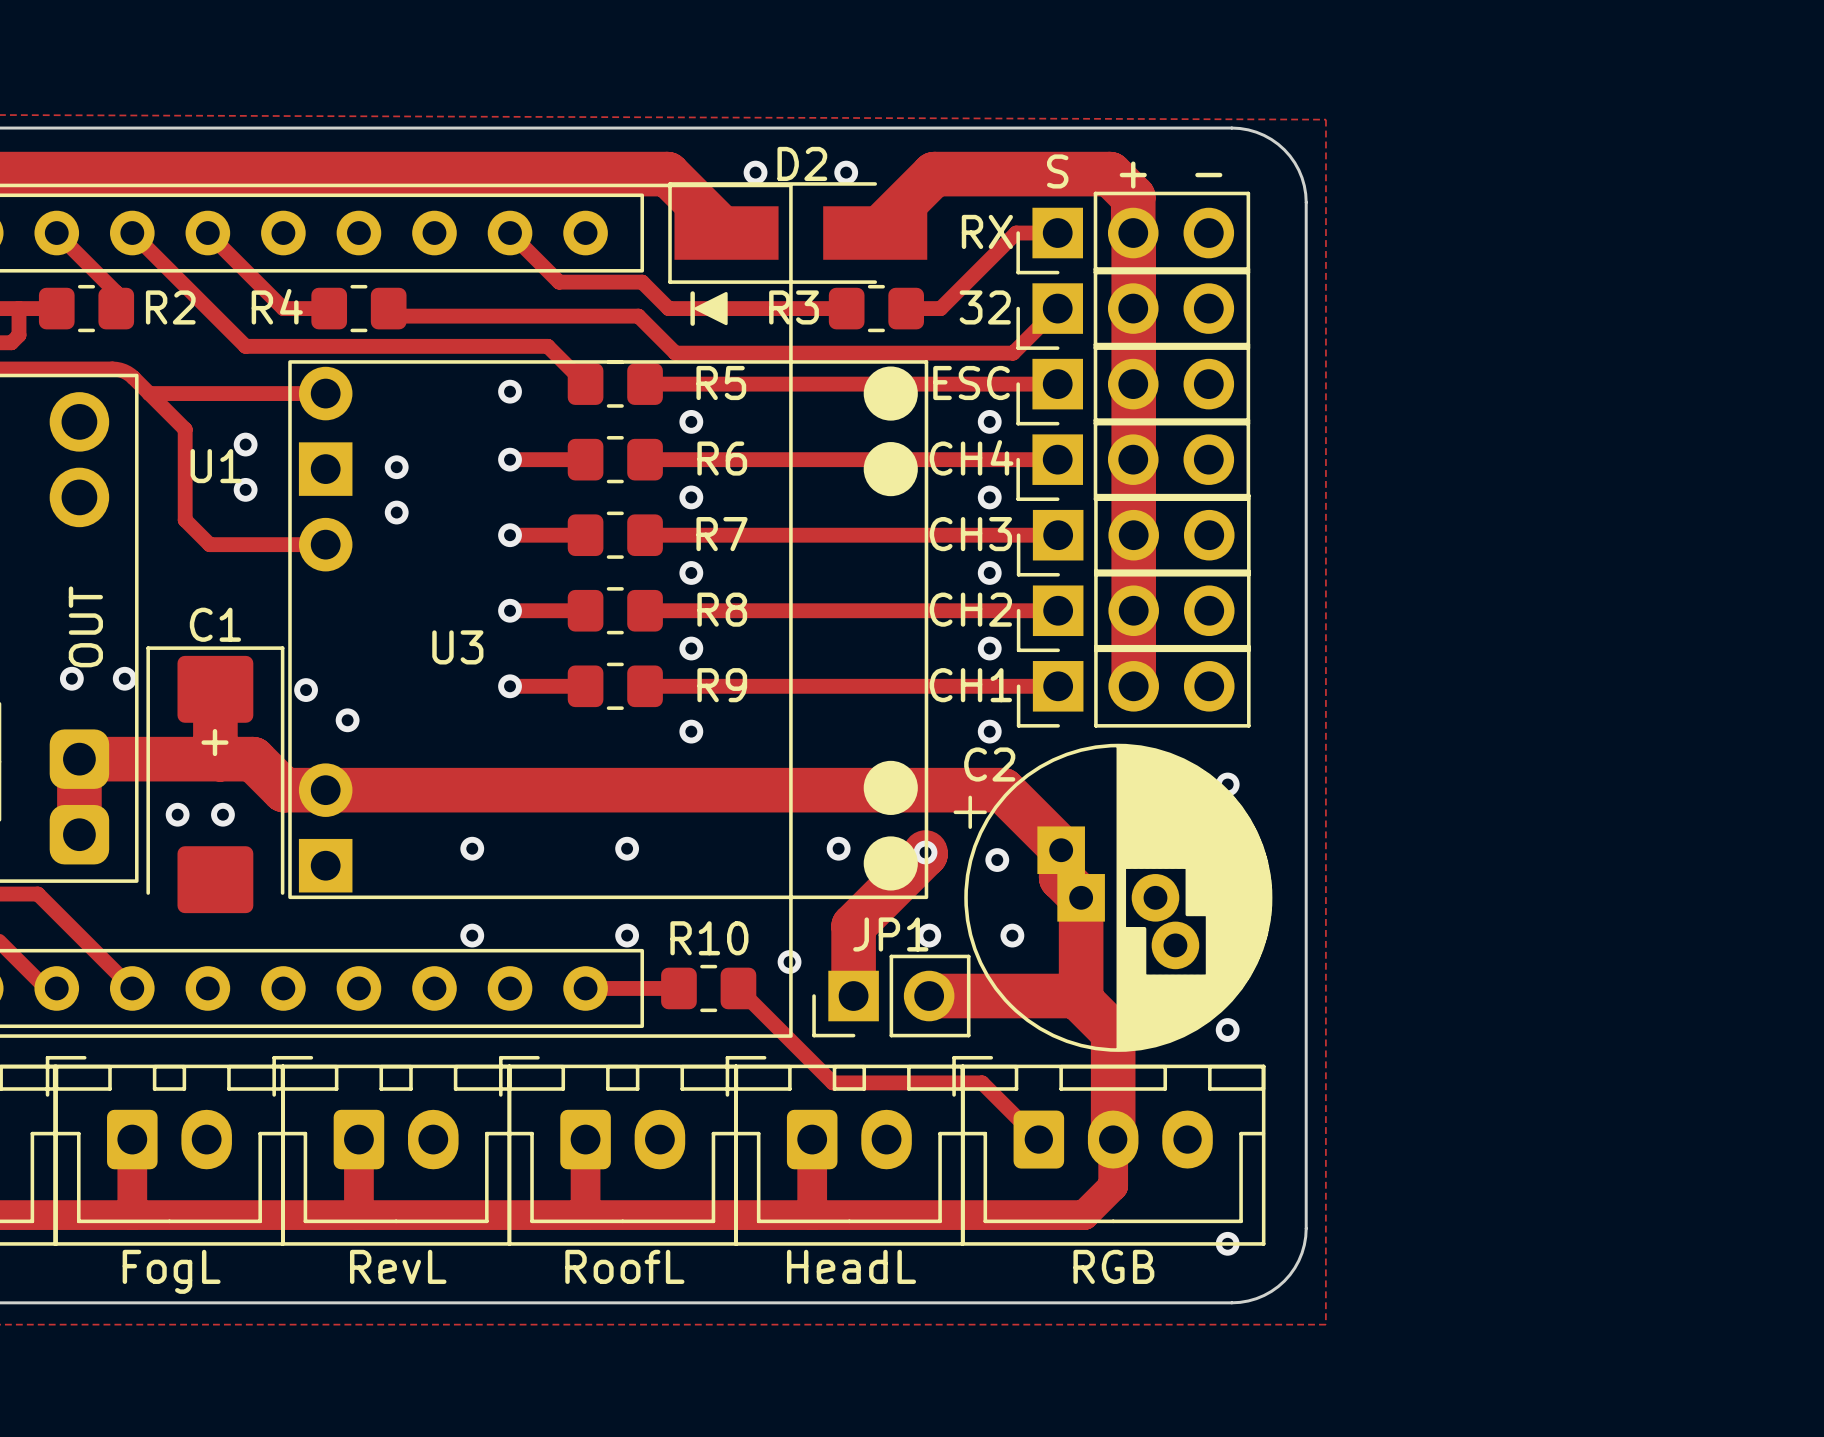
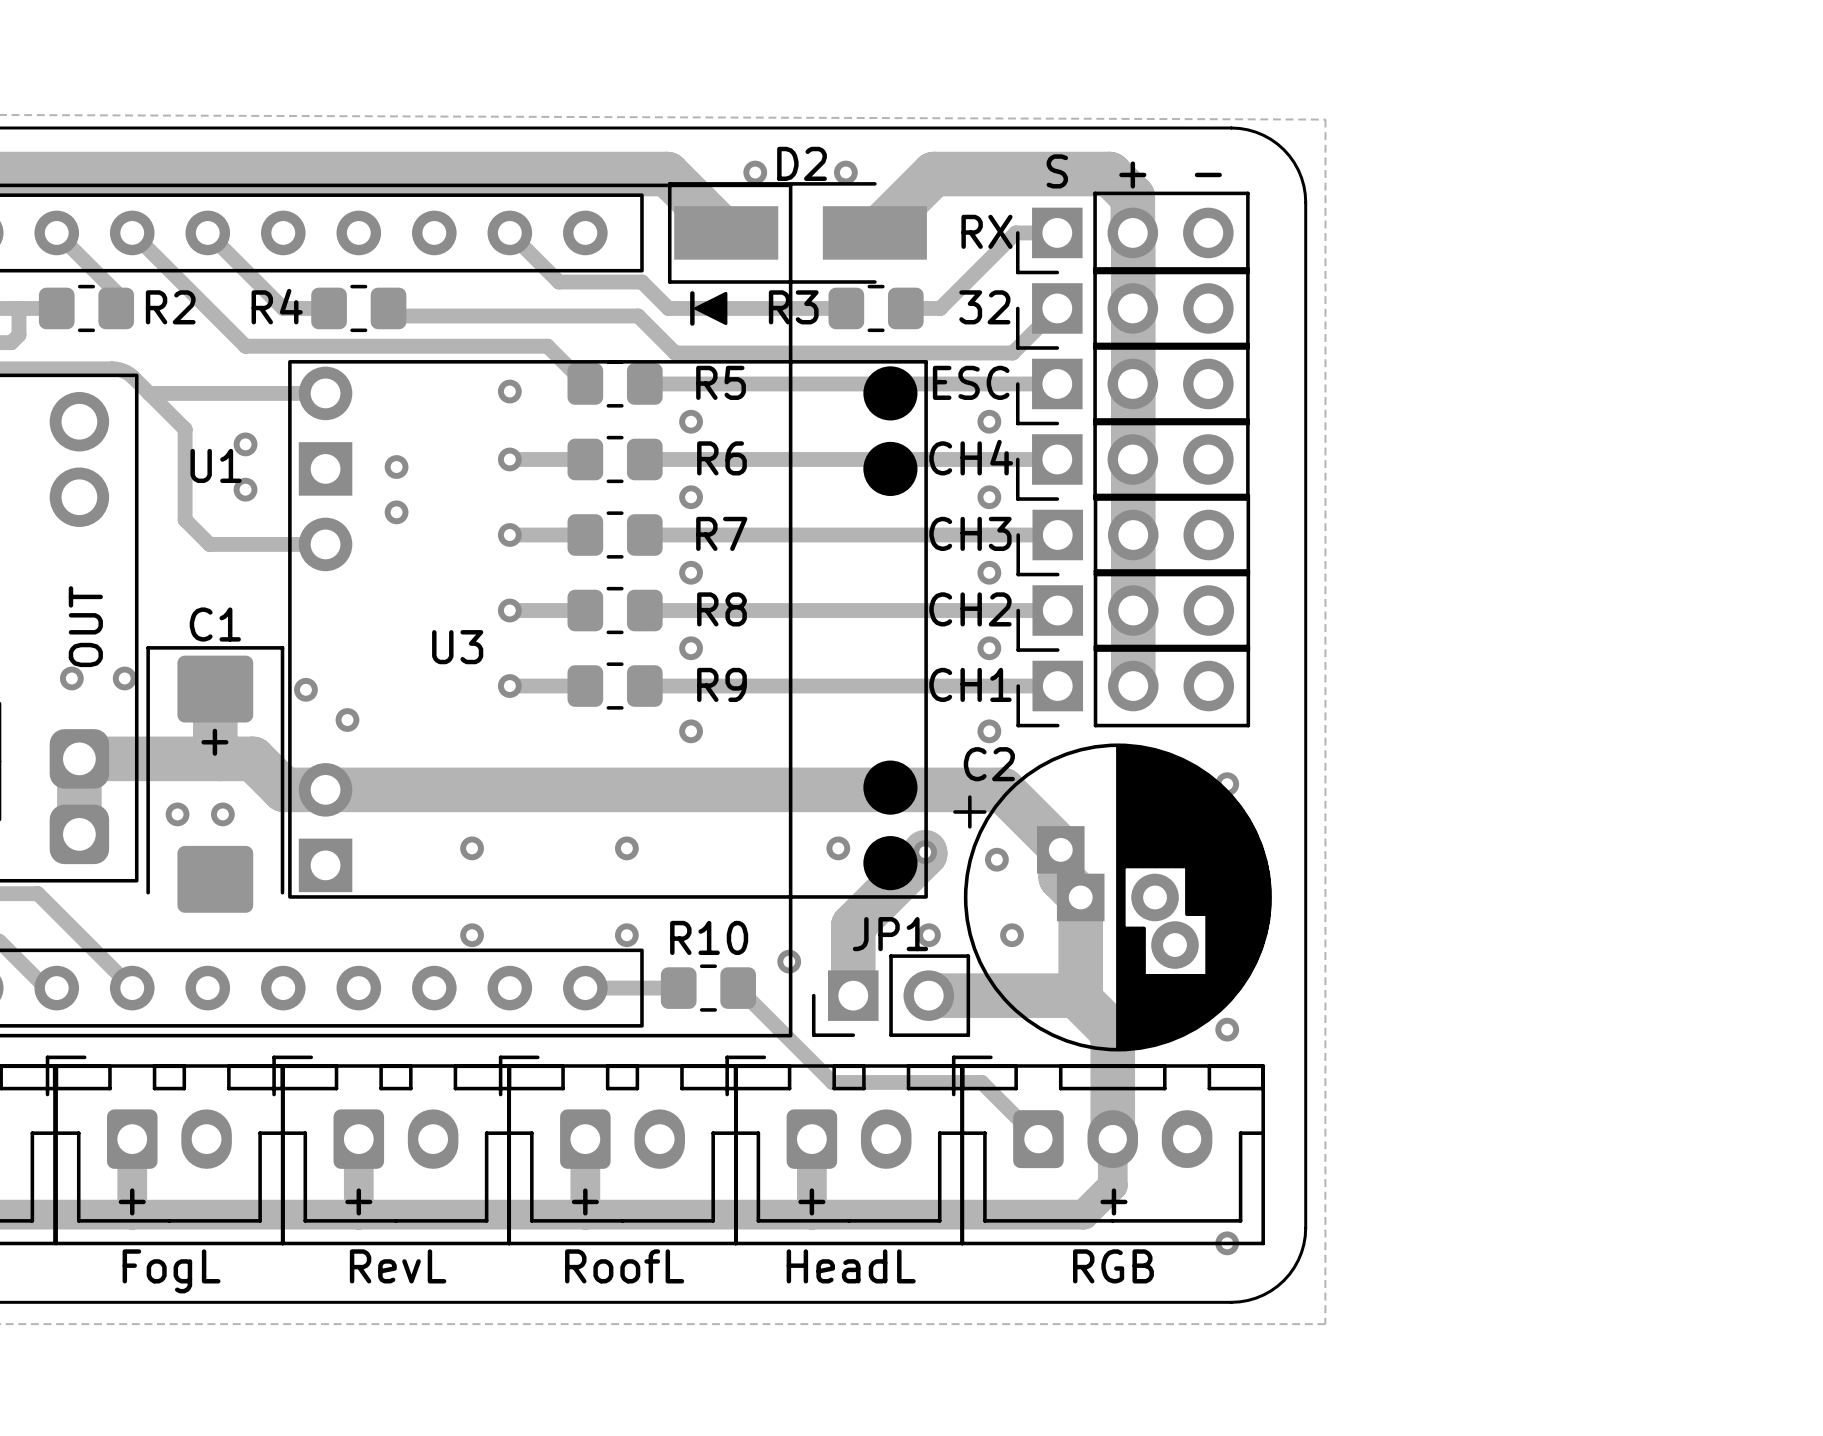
text: none -> + (132, 1201)
text: none -> + (358, 1201)
text: none -> + (585, 1201)
text: none -> + (811, 1201)
text: none -> + (1113, 1201)

